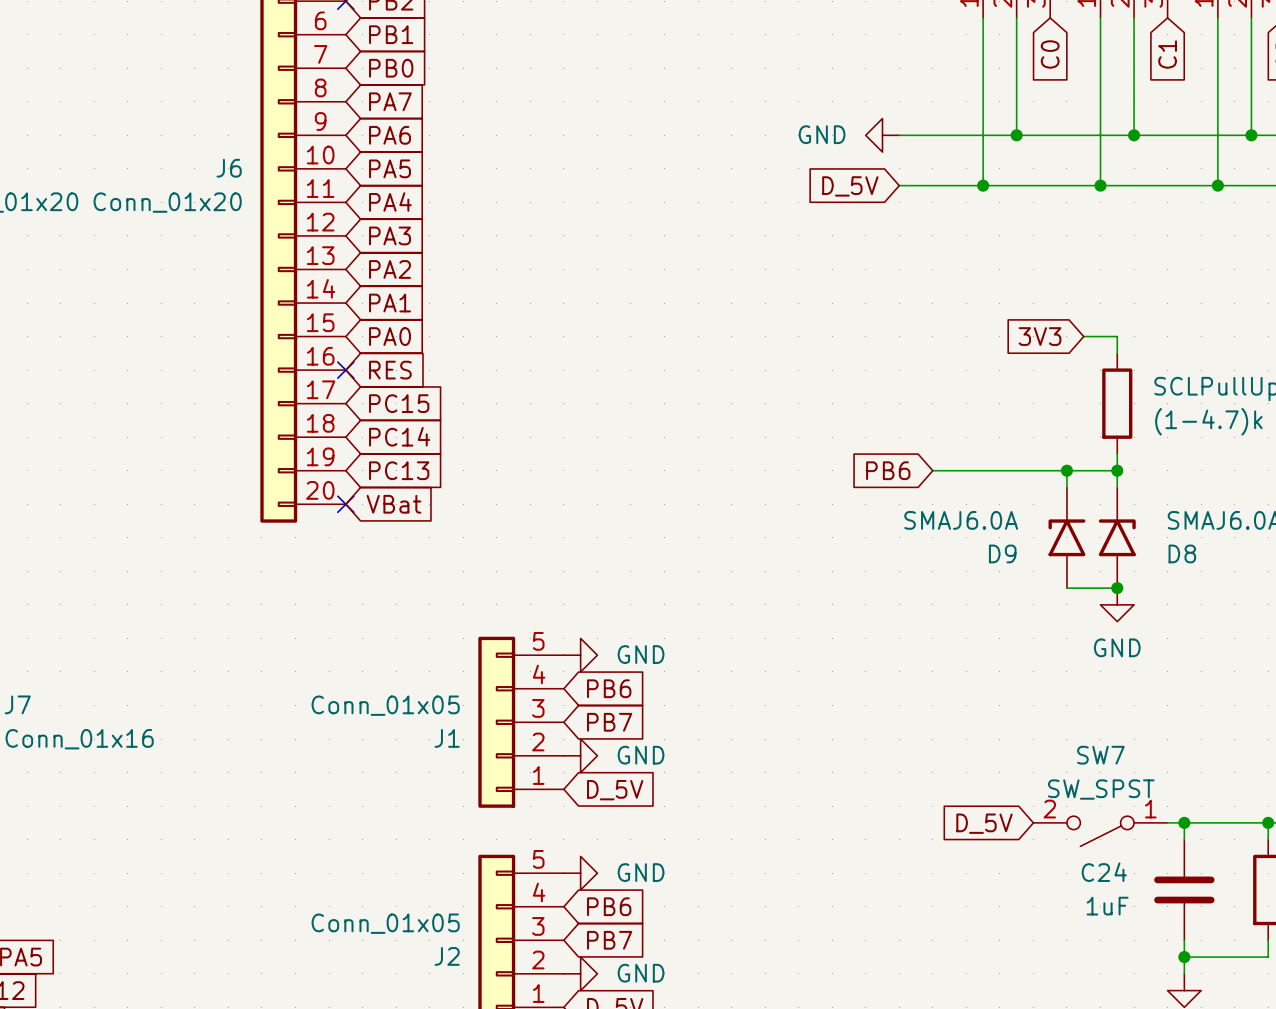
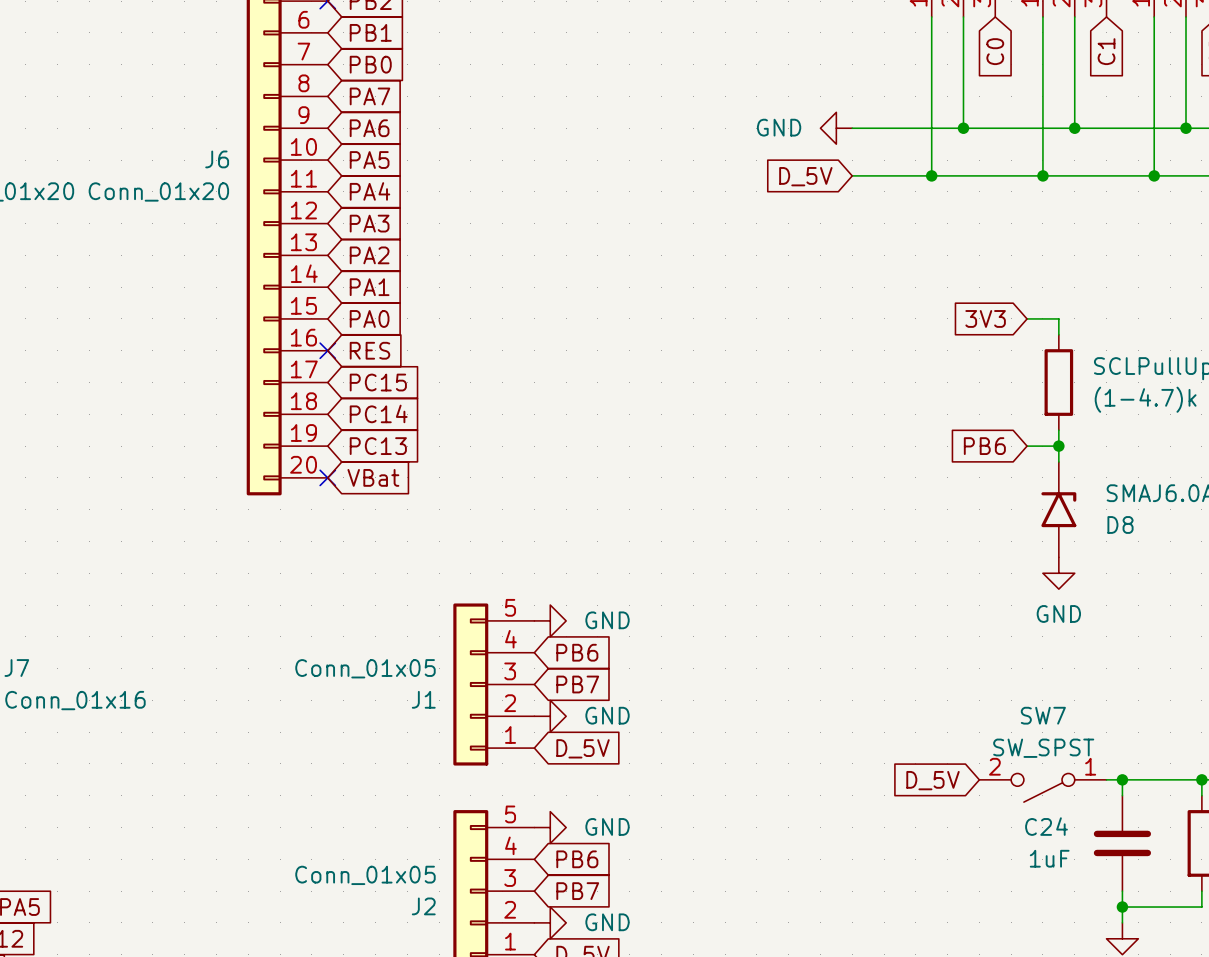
global label position: PB6 (888, 470) -> PB6 (984, 446)
wire: (932, 470) (1083, 470) -> none
wire: (1066, 470) (1066, 487) -> none
junction: (1066, 470) -> none
D9: SMAJ6.0A (1066, 537) -> none
wire: (1066, 588) (1117, 588) -> none
junction: (1117, 588) -> none

